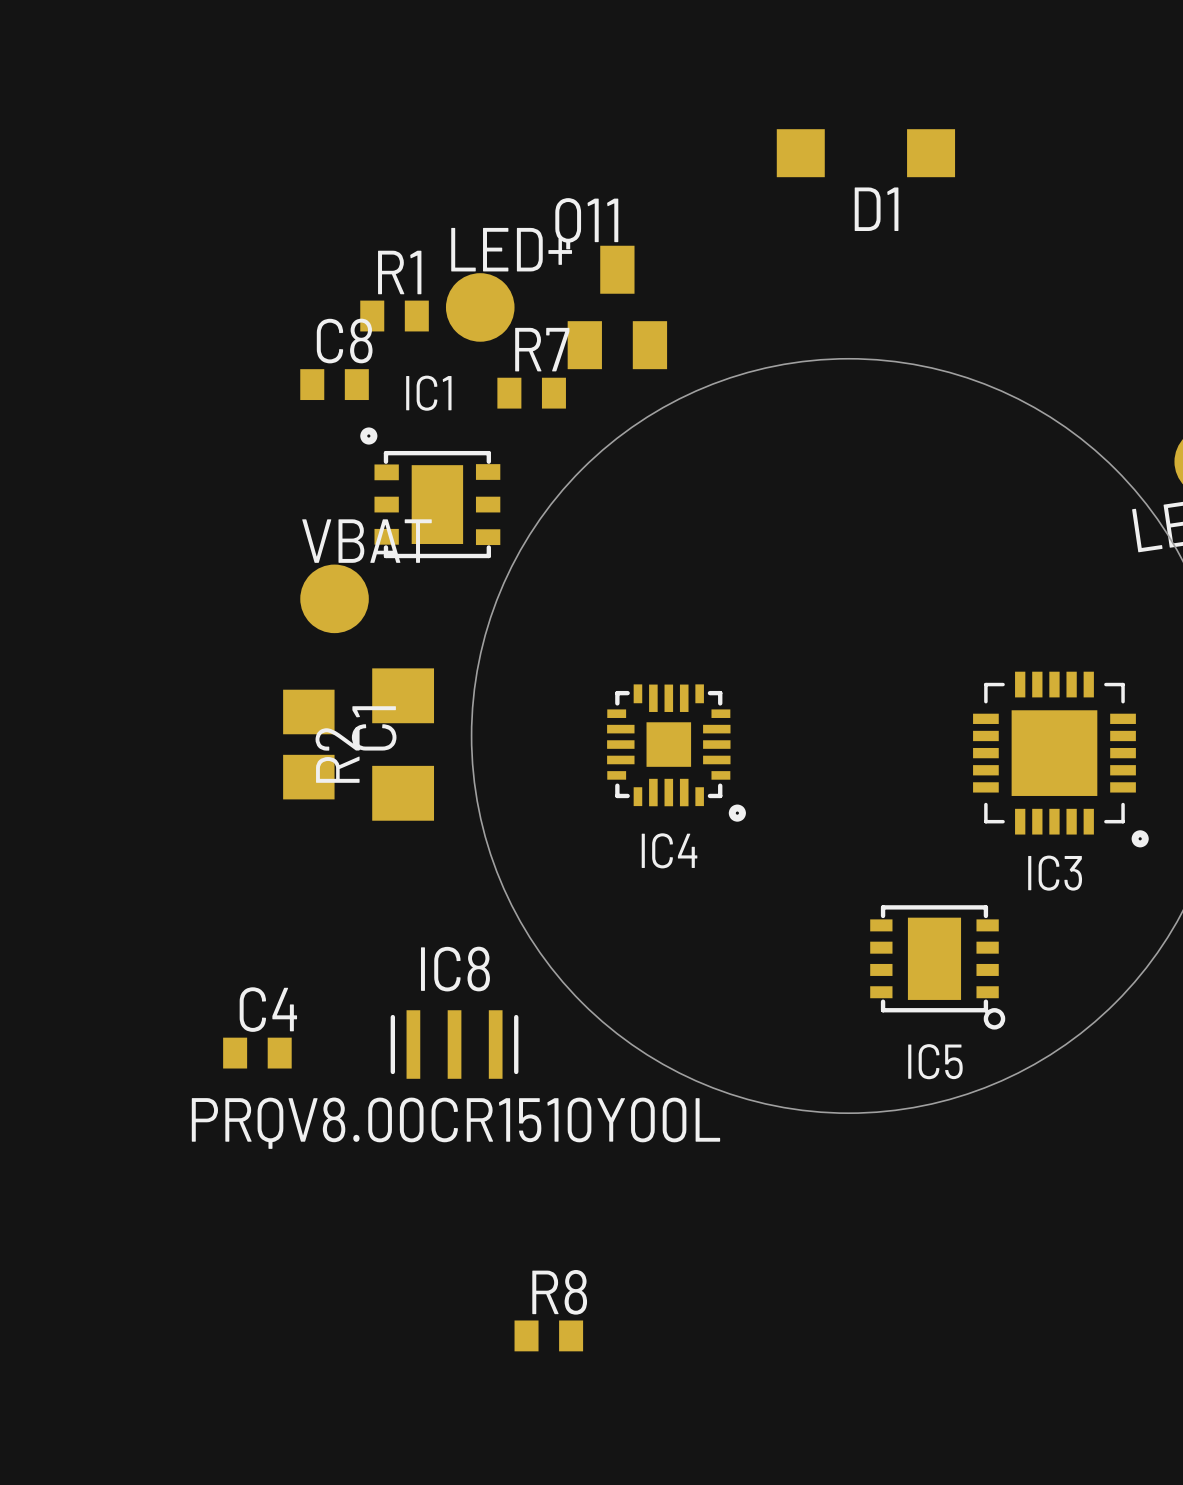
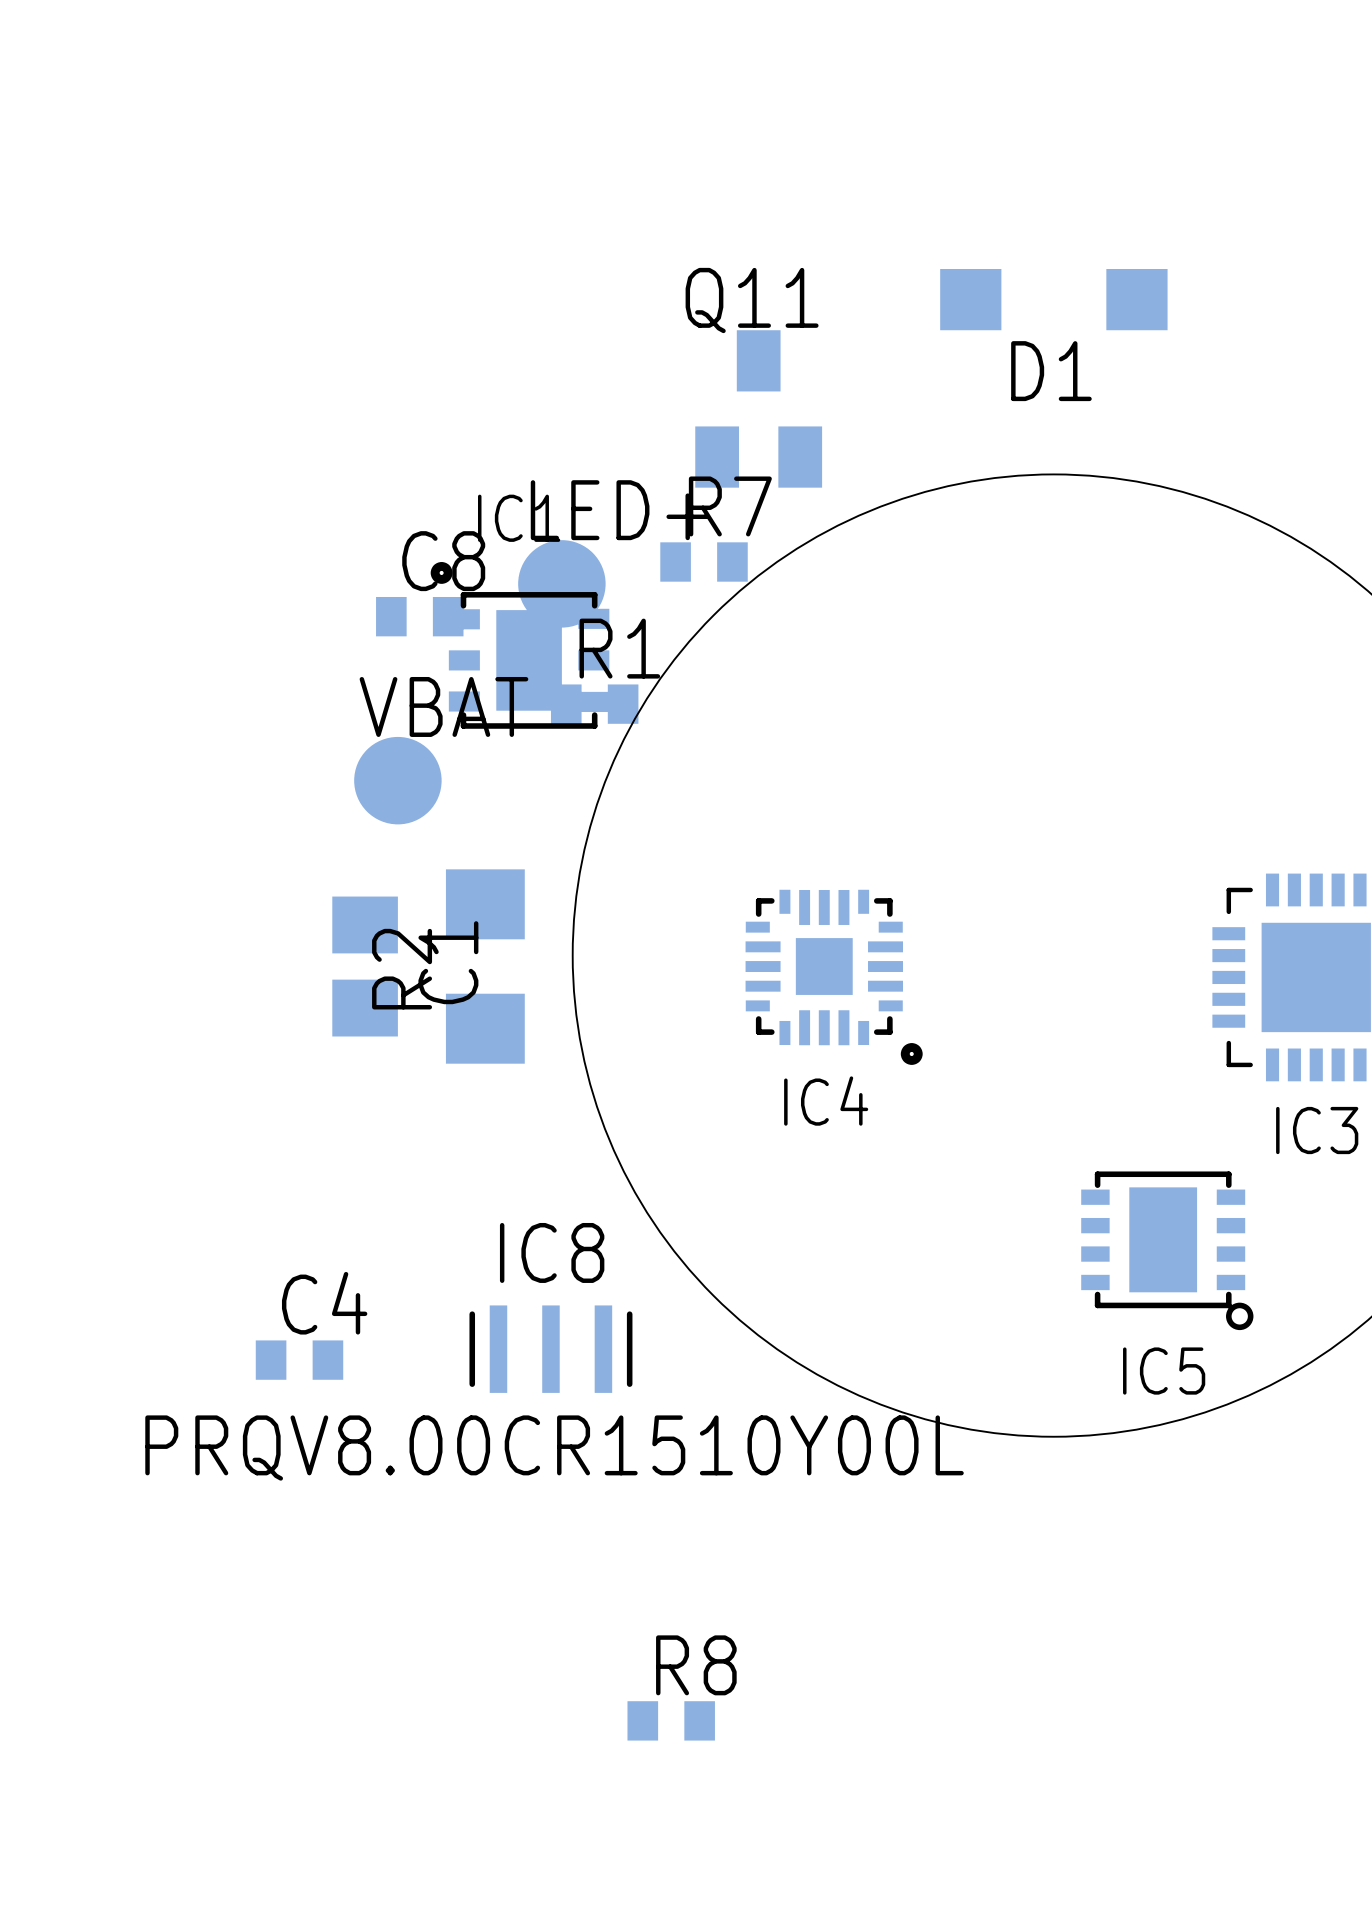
D1 position: (865, 153) -> (1053, 299)
LED+ position: (480, 307) -> (561, 583)
R1 position: (394, 316) -> (594, 704)
C8 position: (334, 384) -> (419, 616)
R7 position: (531, 393) -> (704, 562)

